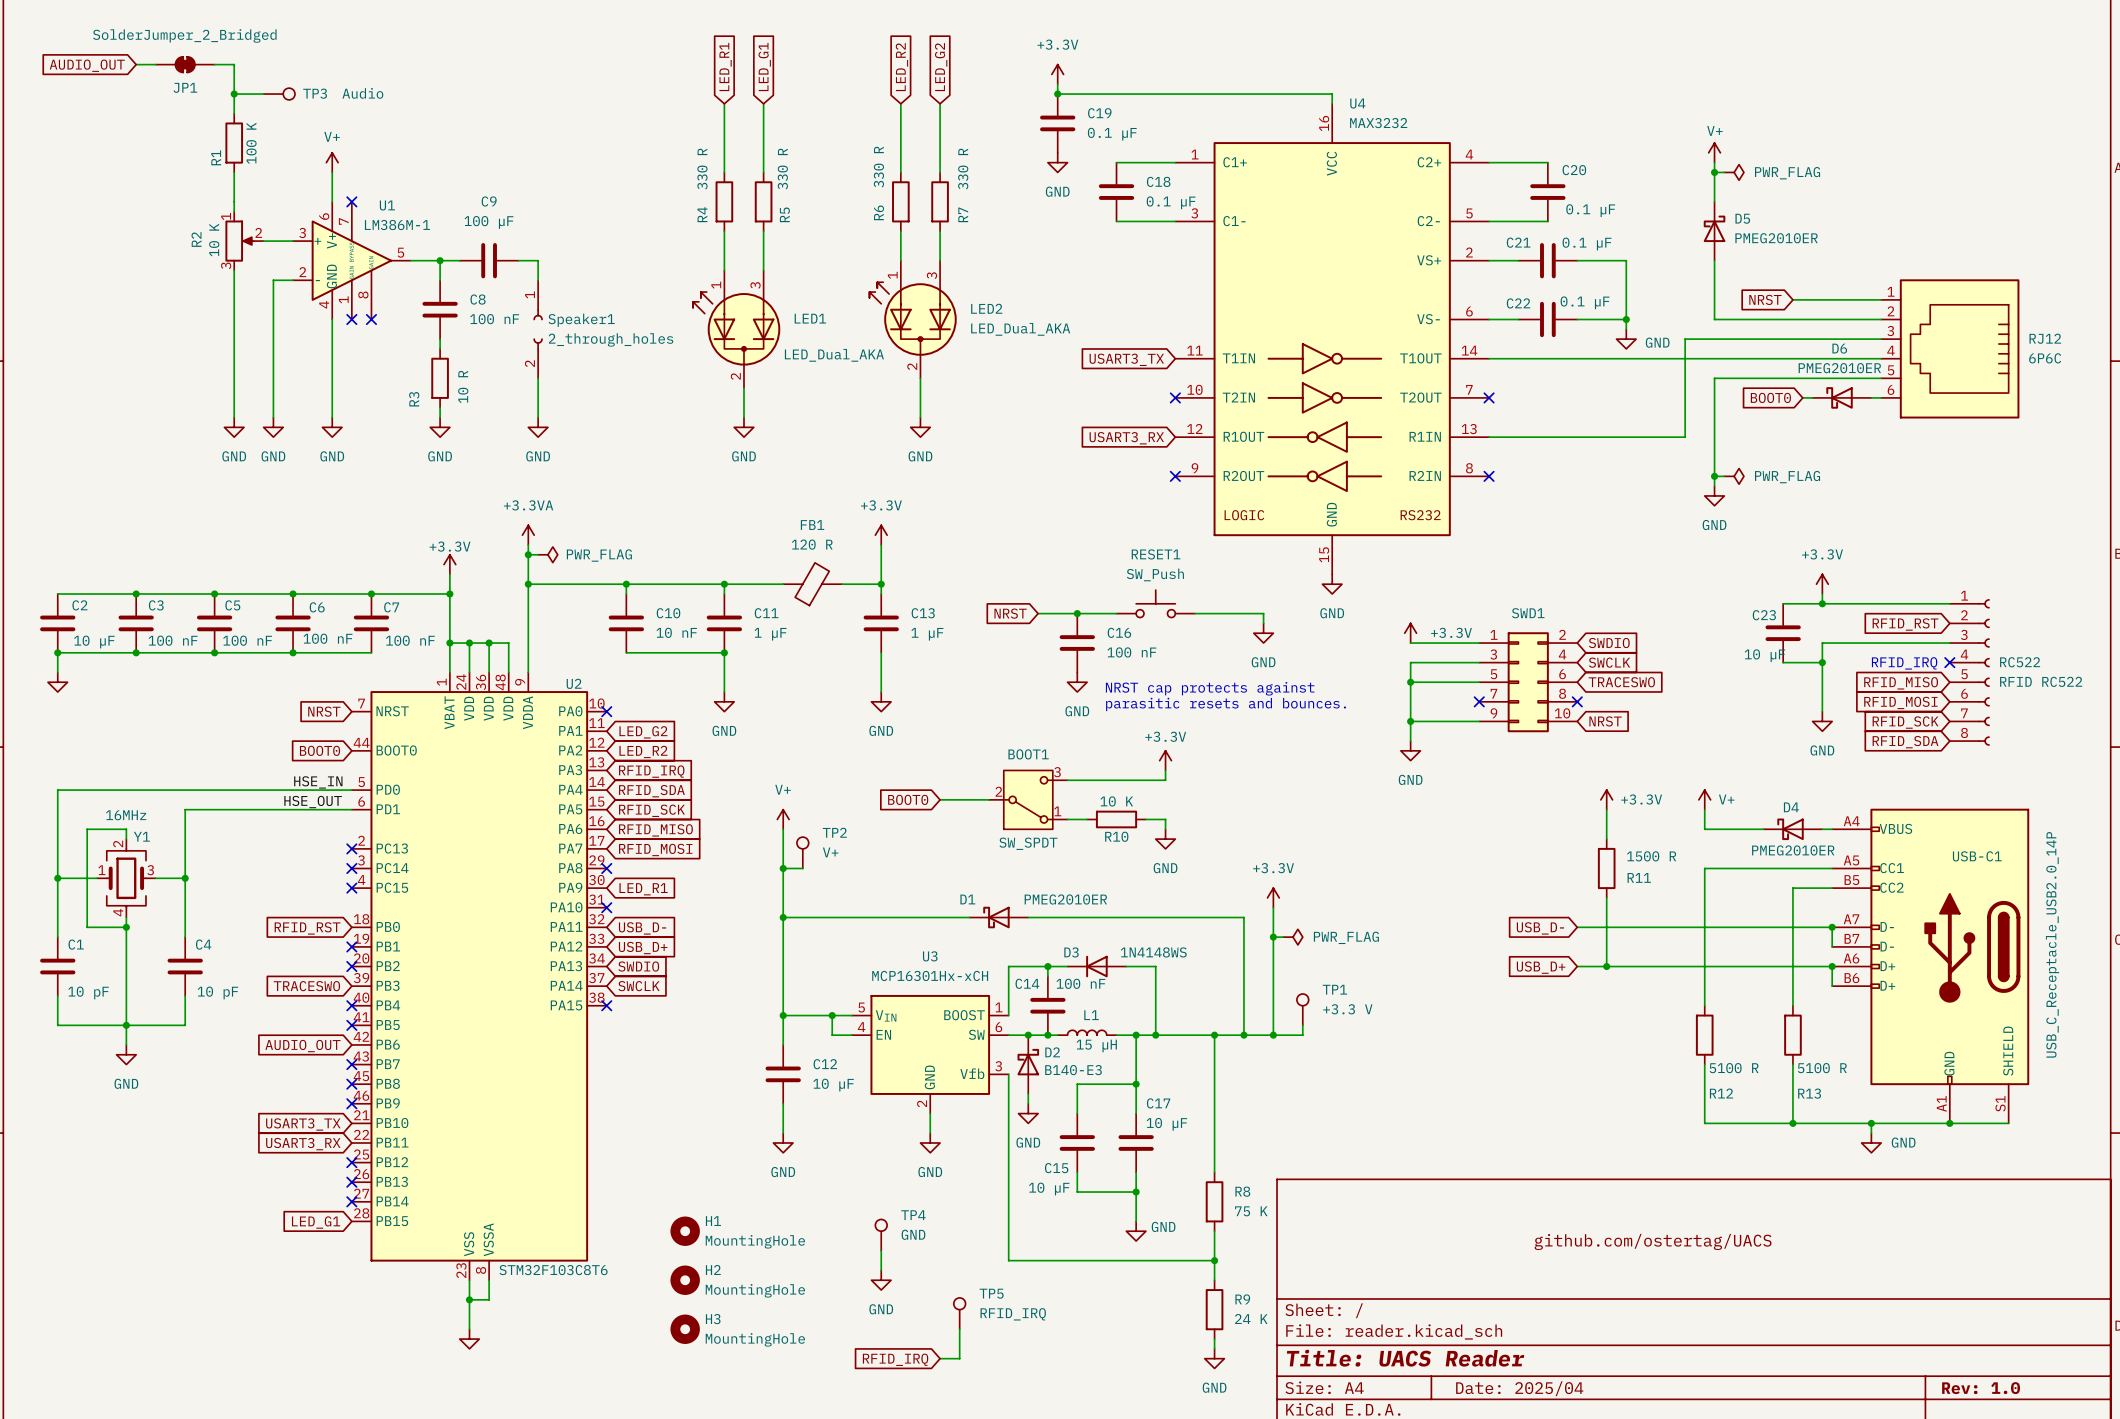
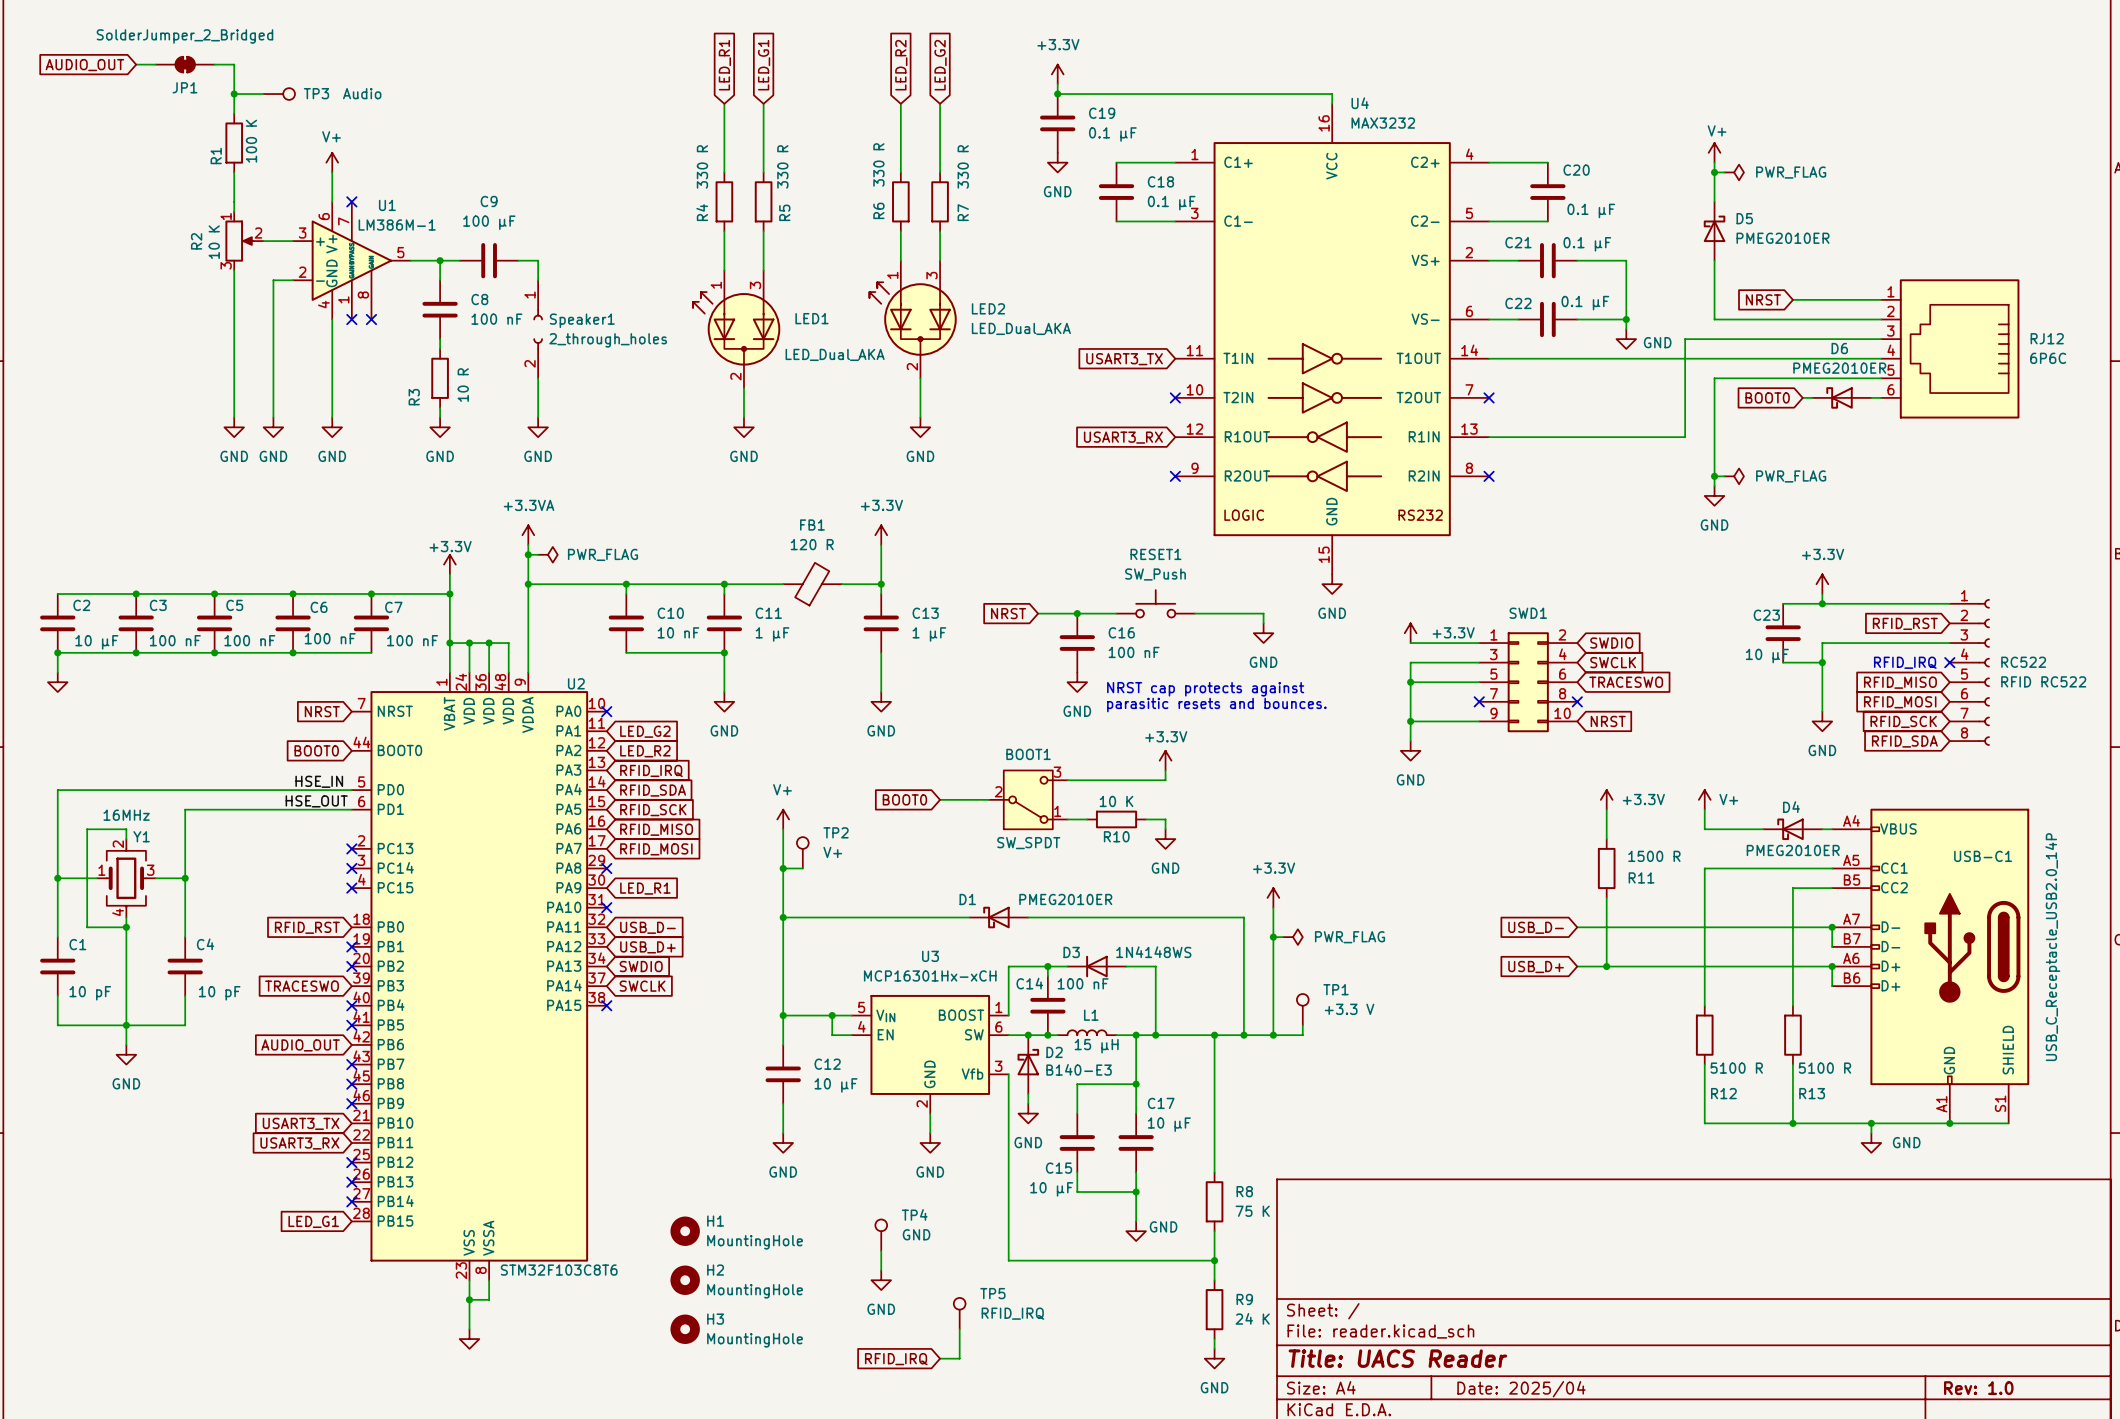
title block: github.com/ostertag/UACS (1653, 1241) -> none

